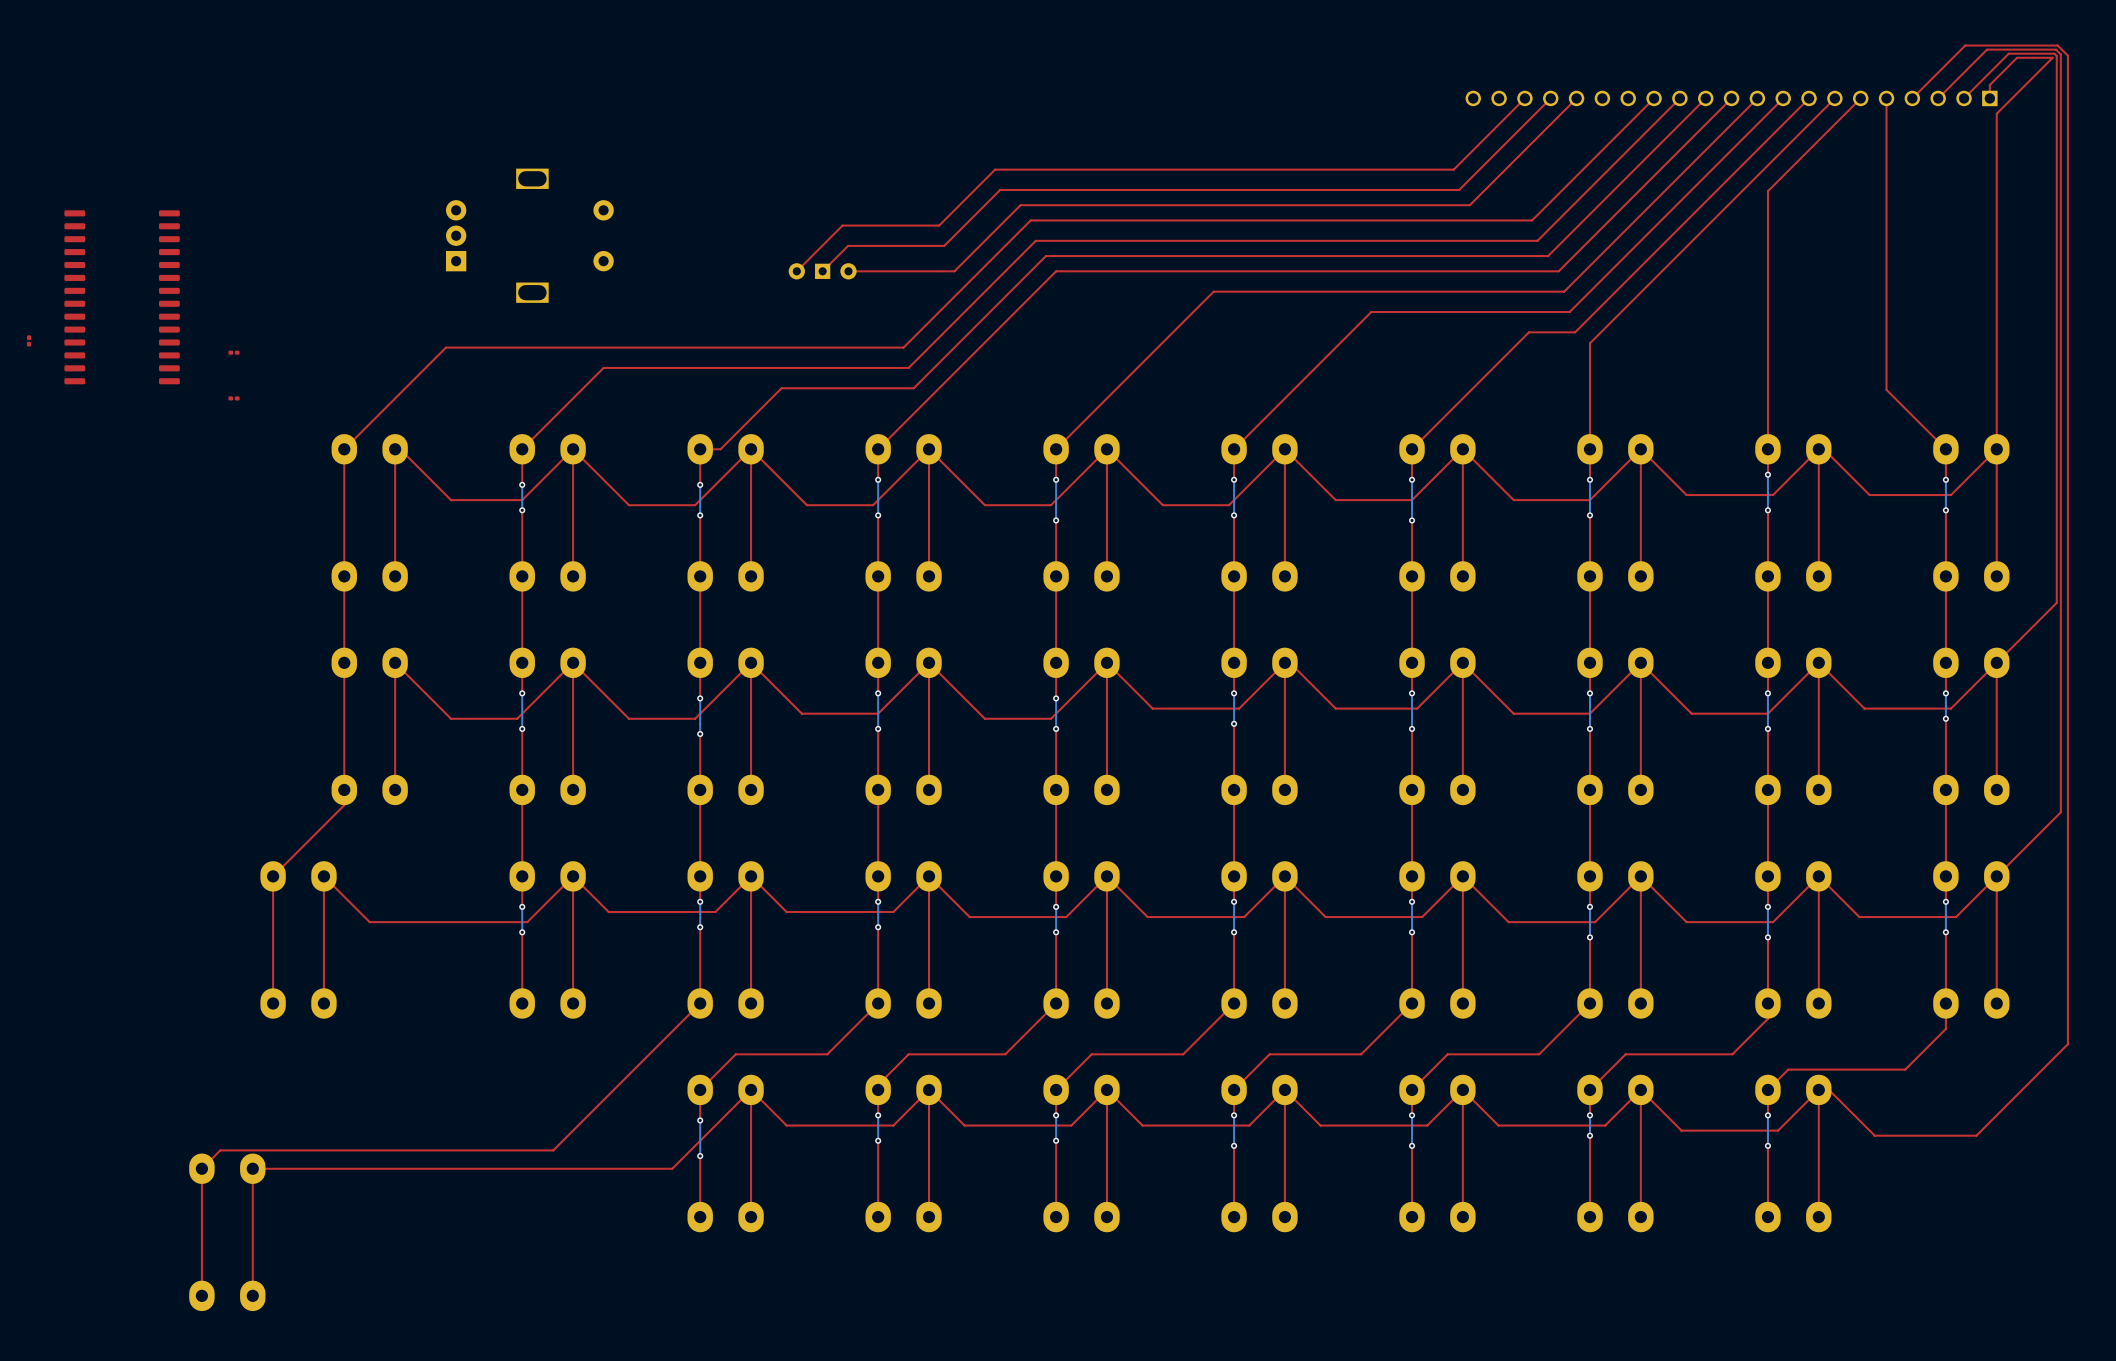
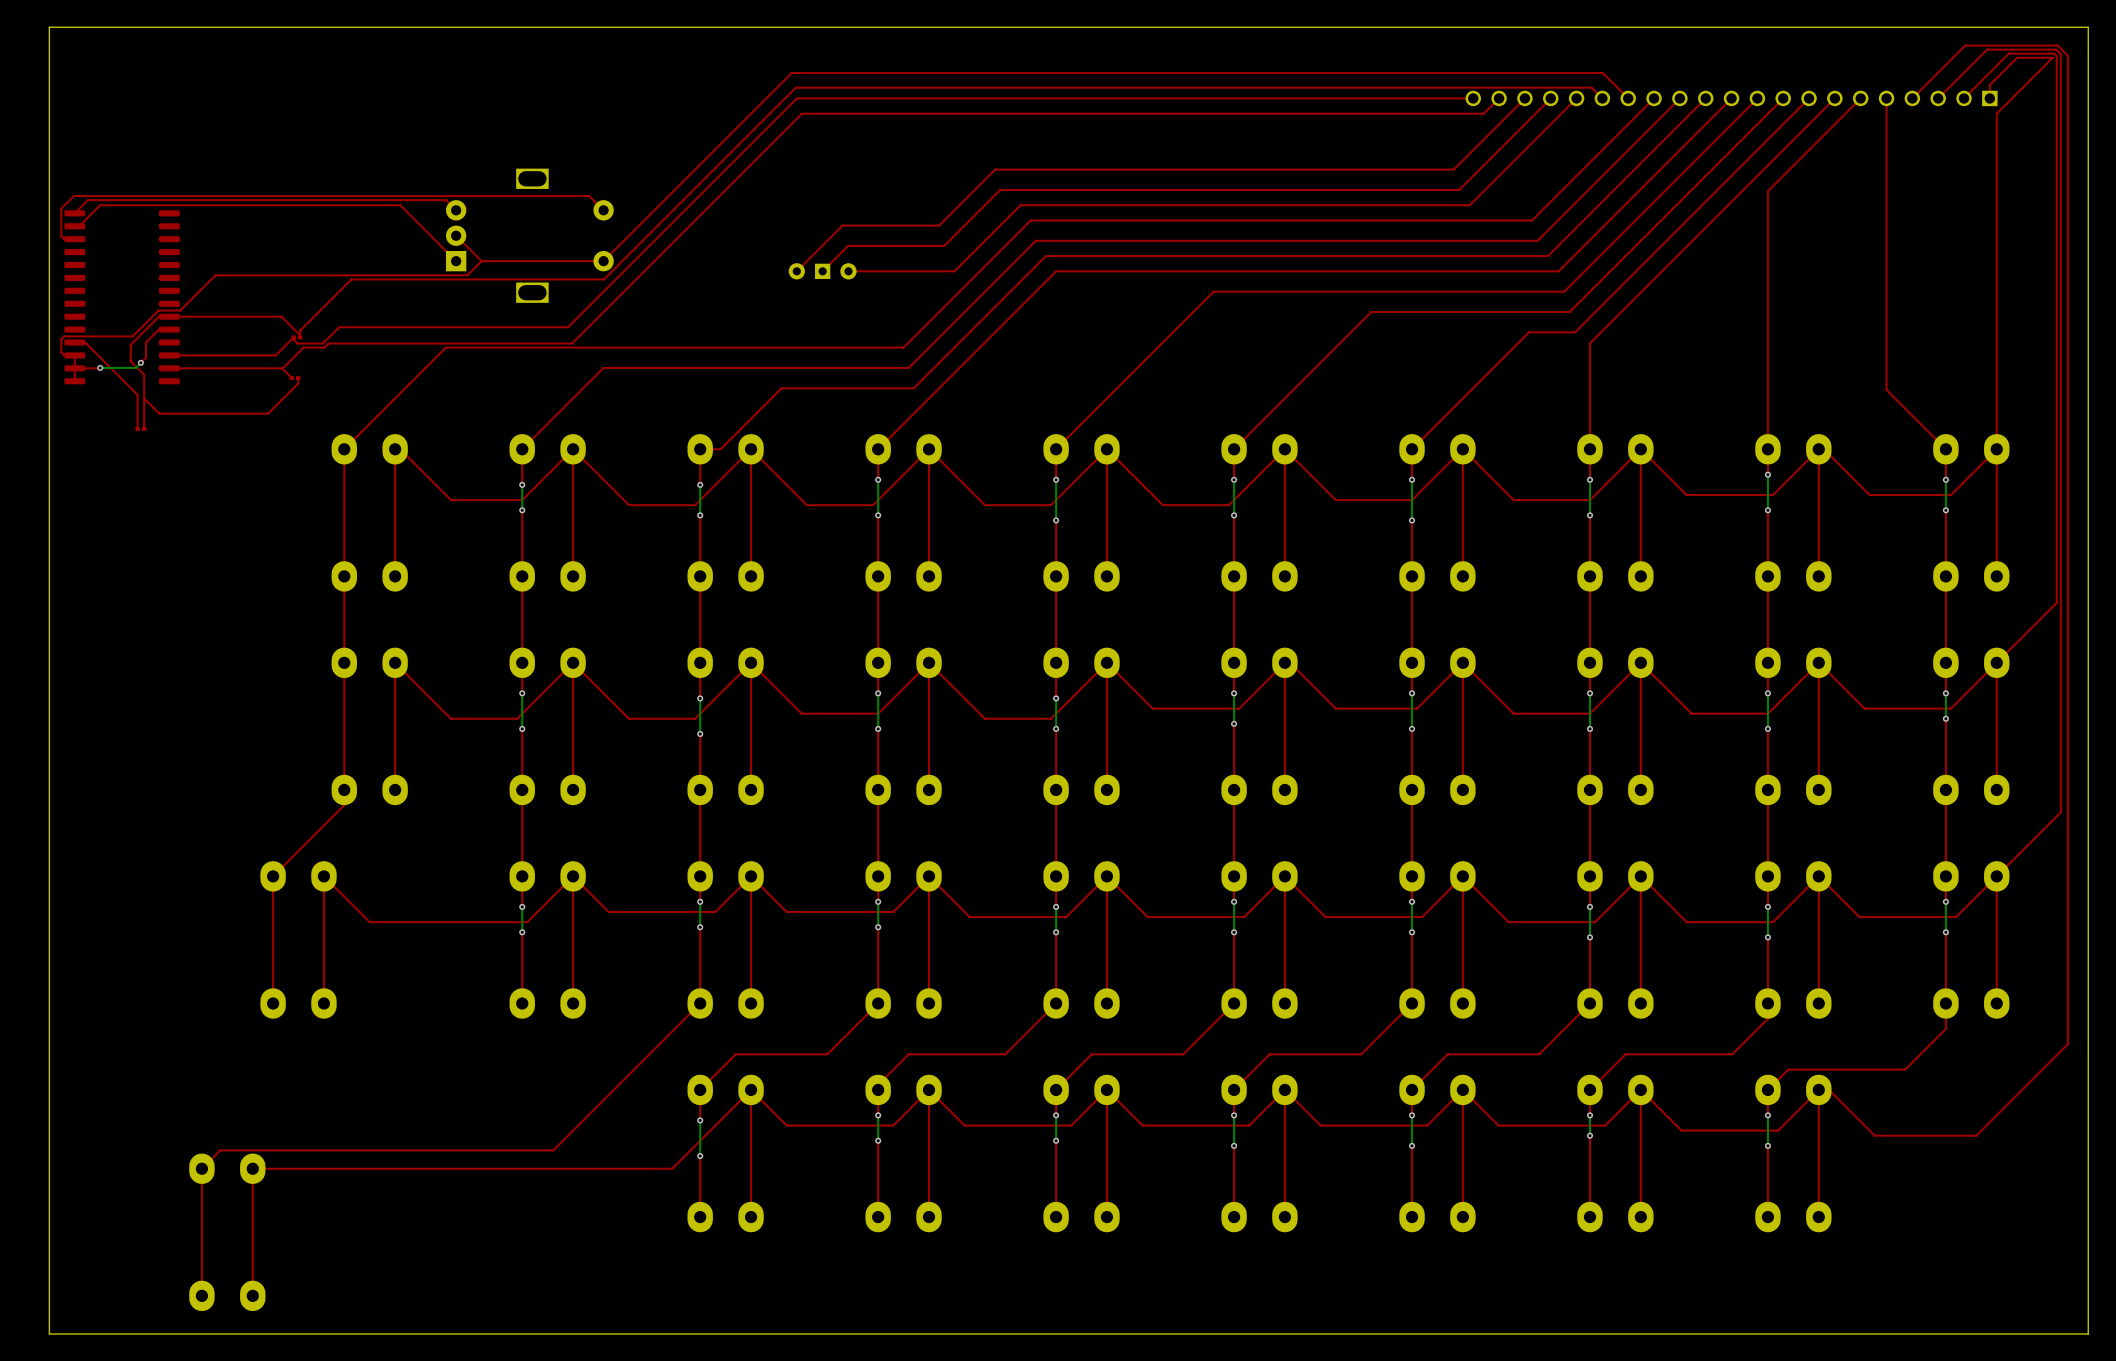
board edge: none -> (2088, 27) (49, 27) (49, 1333) (2088, 1333) (2088, 27)
top track: none -> (1473, 98) (796, 98) (568, 327) (339, 327) (322, 343) (297, 343) (293, 337) (275, 355) (169, 355)
top track: none -> (1499, 98) (1483, 113) (801, 113) (572, 343) (328, 343) (324, 347) (303, 347) (282, 368) (169, 368)
top track: none -> (1602, 98) (1591, 87) (795, 87) (604, 279) (351, 279) (300, 330) (300, 337)
top track: none -> (1628, 98) (1602, 73) (791, 73) (603, 261) (481, 261)
top track: none -> (456, 210) (445, 200) (88, 200) (74, 213)
top track: none -> (603, 210) (589, 196) (73, 196) (61, 208) (61, 236) (64, 239) (74, 239)
top track: none -> (74, 226) (79, 226) (100, 205) (400, 205) (456, 261)
top track: none -> (456, 235) (481, 261)
top track: none -> (481, 261) (467, 275) (215, 275) (180, 310) (158, 310) (132, 336) (63, 336) (61, 339) (61, 352) (64, 355) (74, 355) (74, 381)
top track: none -> (169, 329) (158, 329) (145, 342) (145, 357) (140, 362)
top track: none -> (300, 335) (281, 316) (158, 316) (130, 344) (130, 361) (144, 374) (144, 428)
part: none -> (296, 337)
part: (29, 340) -> none
top track: none -> (74, 342) (85, 342) (137, 394) (137, 428)
part: (234, 352) -> none
bottom track: none -> (140, 362) (135, 367) (100, 367)
via: none -> (140, 362)
top track: none -> (100, 367) (74, 368)
via: none -> (100, 367)
top track: none -> (282, 368) (291, 378)
part: none -> (295, 378)
top track: none -> (298, 378) (298, 383) (268, 413) (159, 413) (144, 398)
part: (234, 398) -> none
part: none -> (140, 428)

